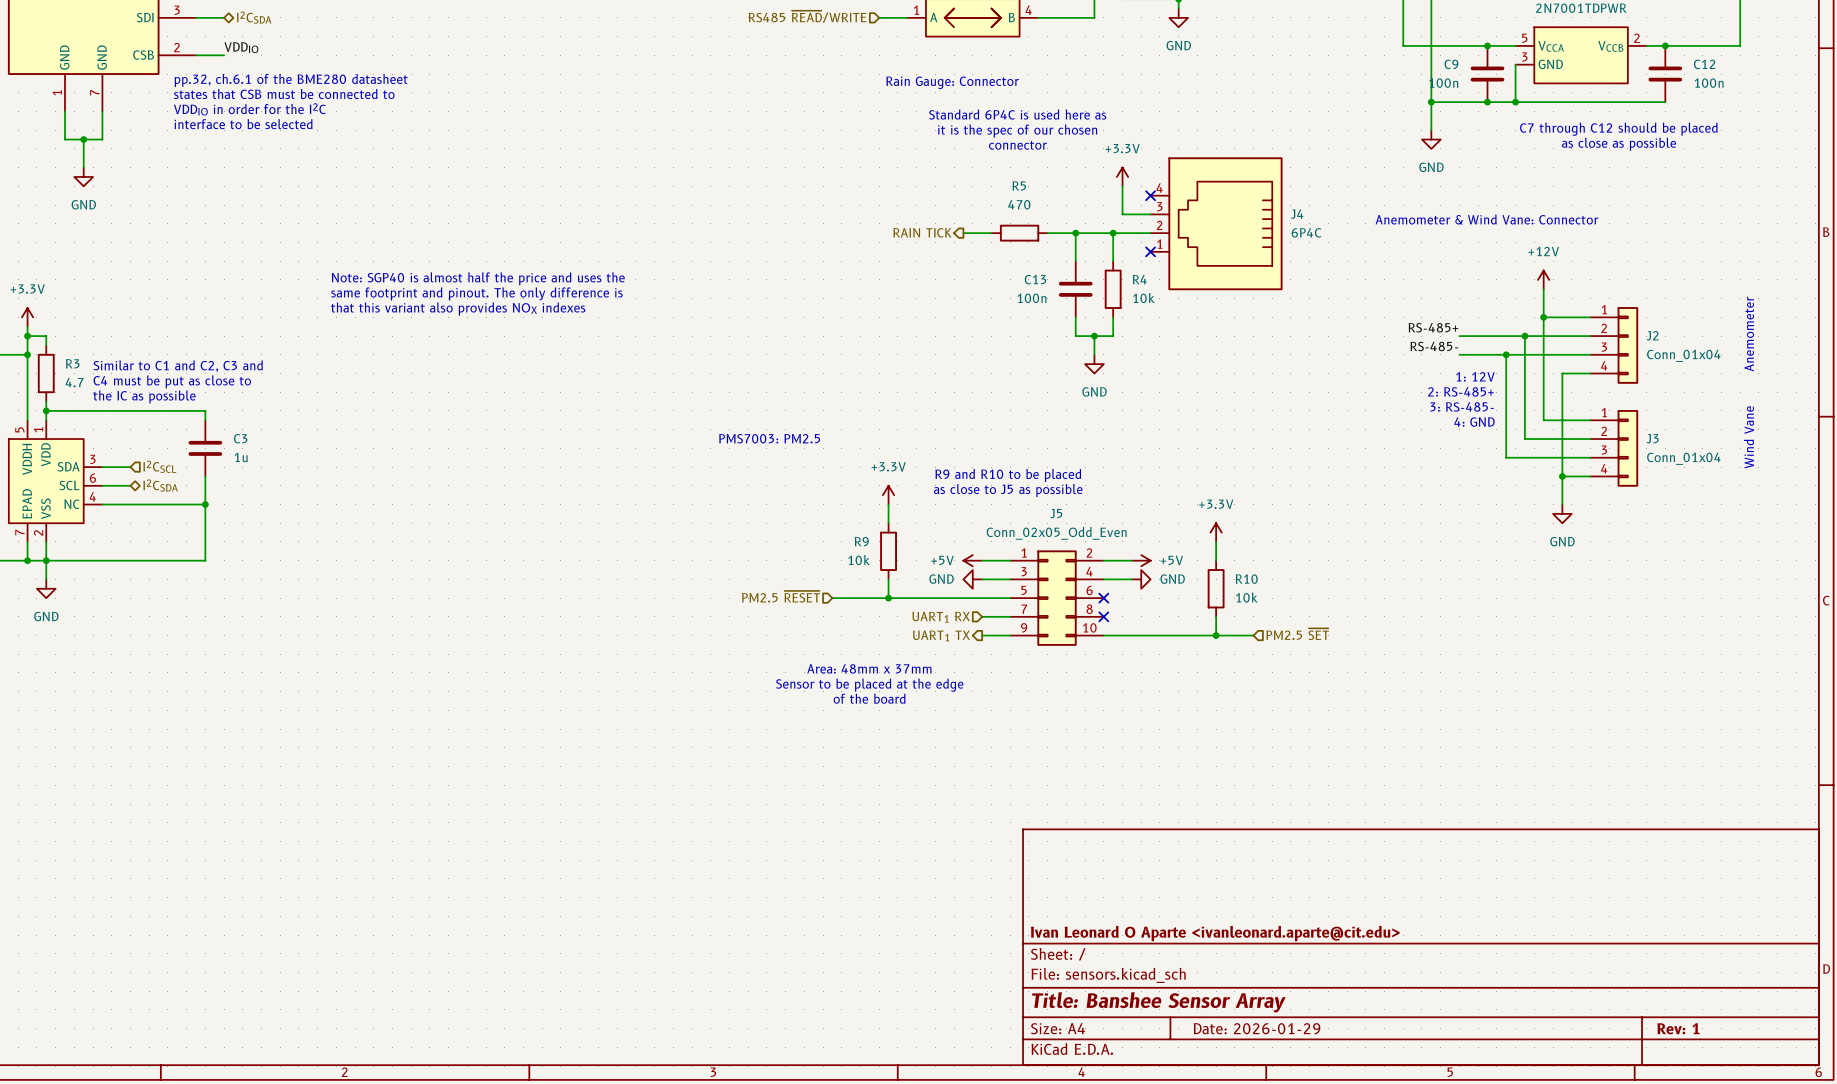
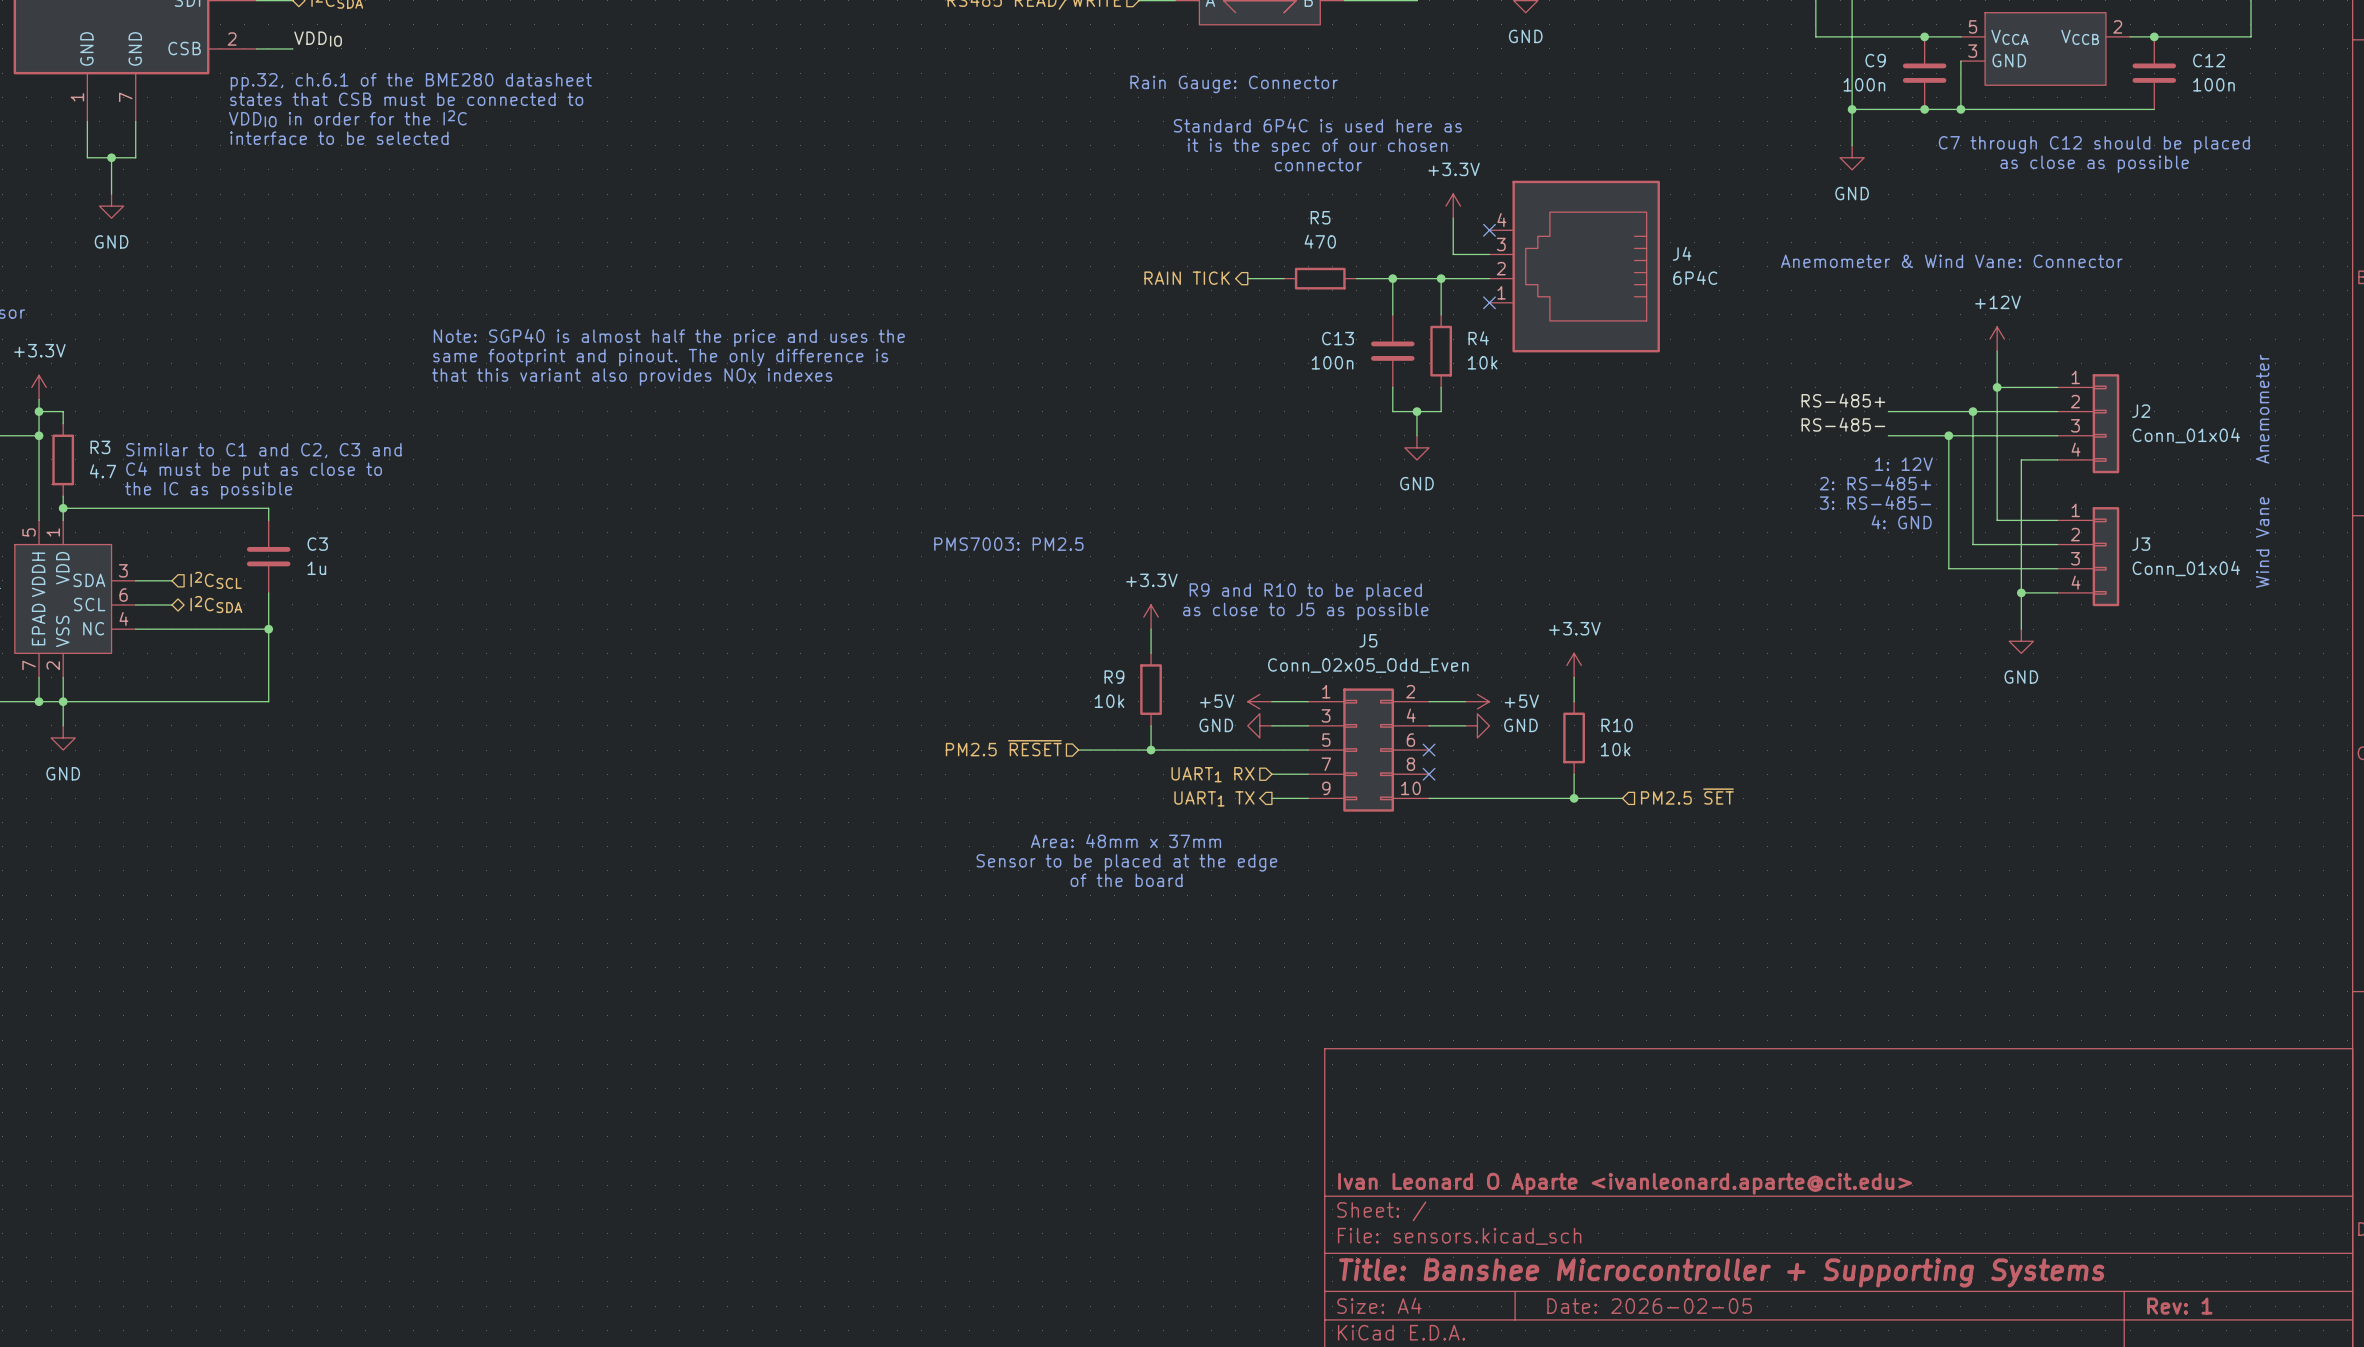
title block: Title: Banshee Sensor Array (1158, 1002) -> Title: Banshee Microcontroller + Supporting Systems (1721, 1272)
title block: Date: 2026-01-29 (1257, 1028) -> Date: 2026-02-05 (1649, 1306)

